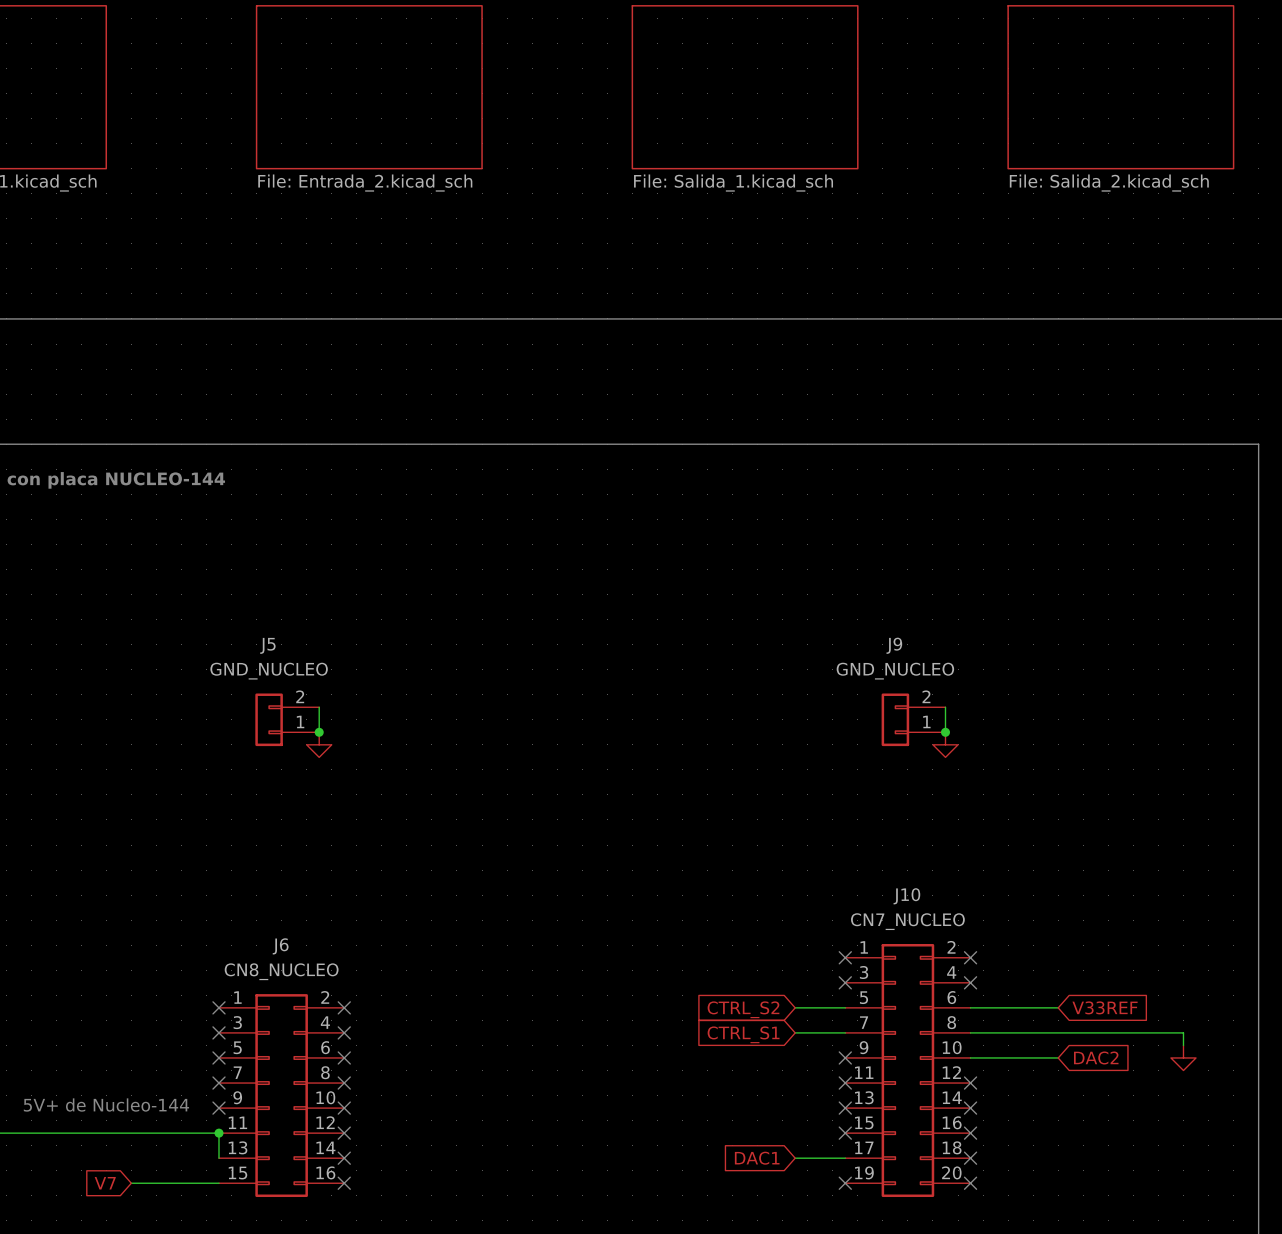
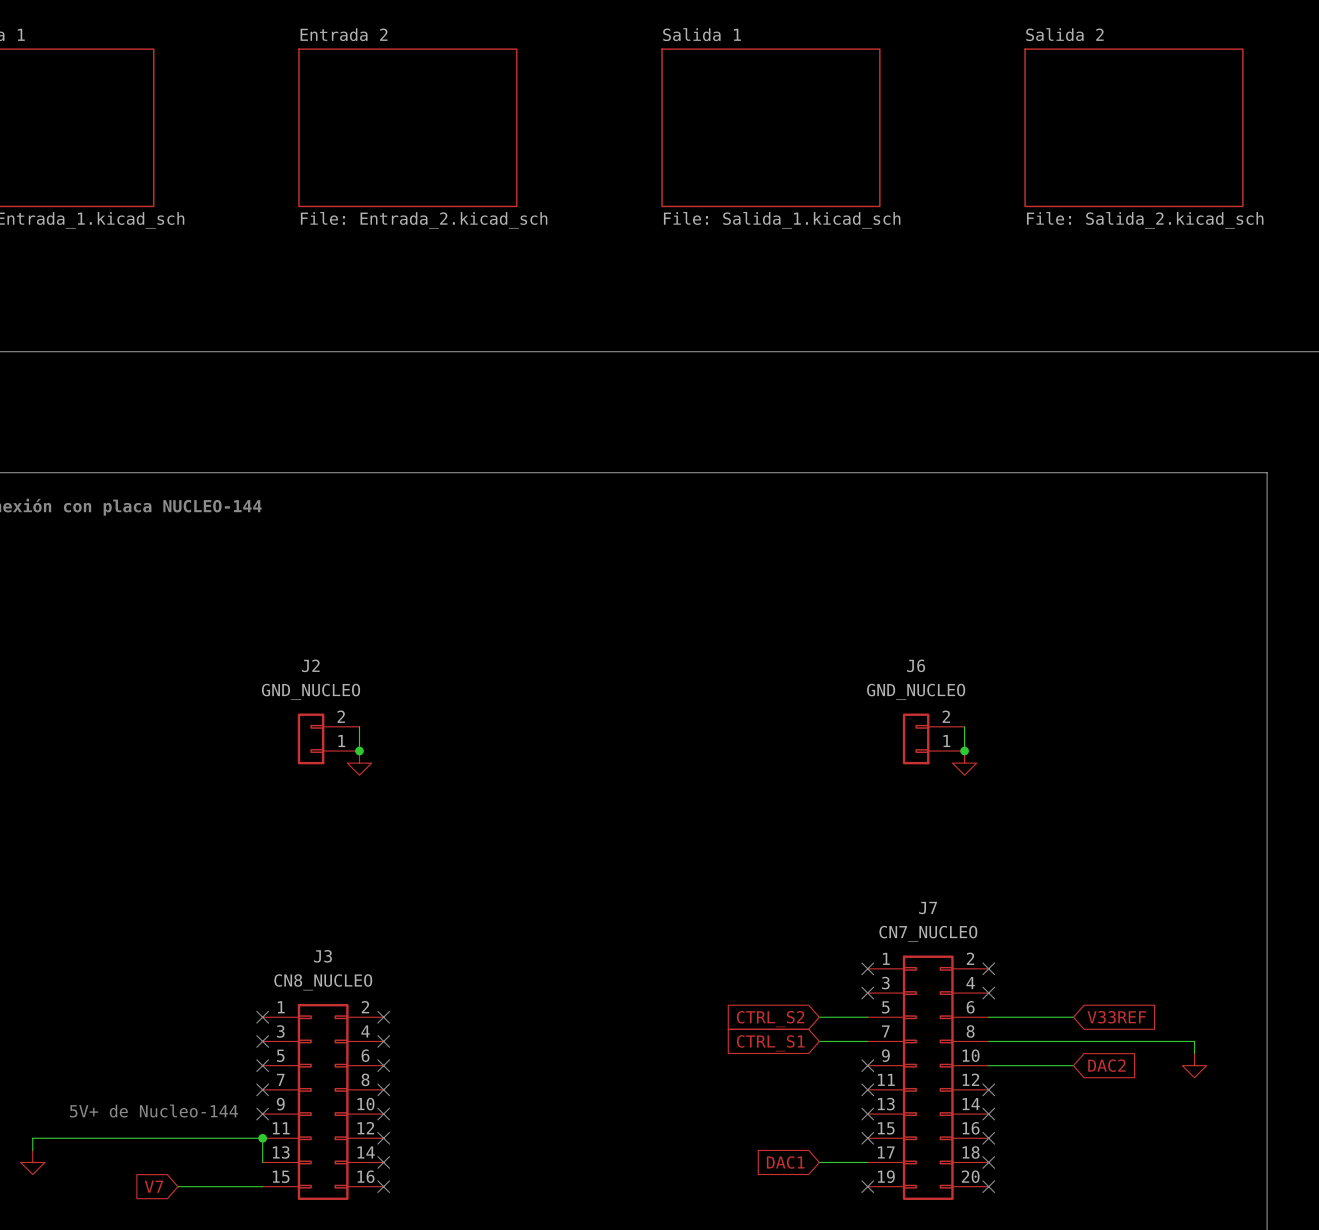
J5 name: J5 (267, 645) -> J2 (310, 665)
J9 name: J9 (894, 645) -> J6 (916, 665)
J10 name: J10 (906, 896) -> J7 (928, 908)
J6 name: J6 (280, 946) -> J3 (323, 956)

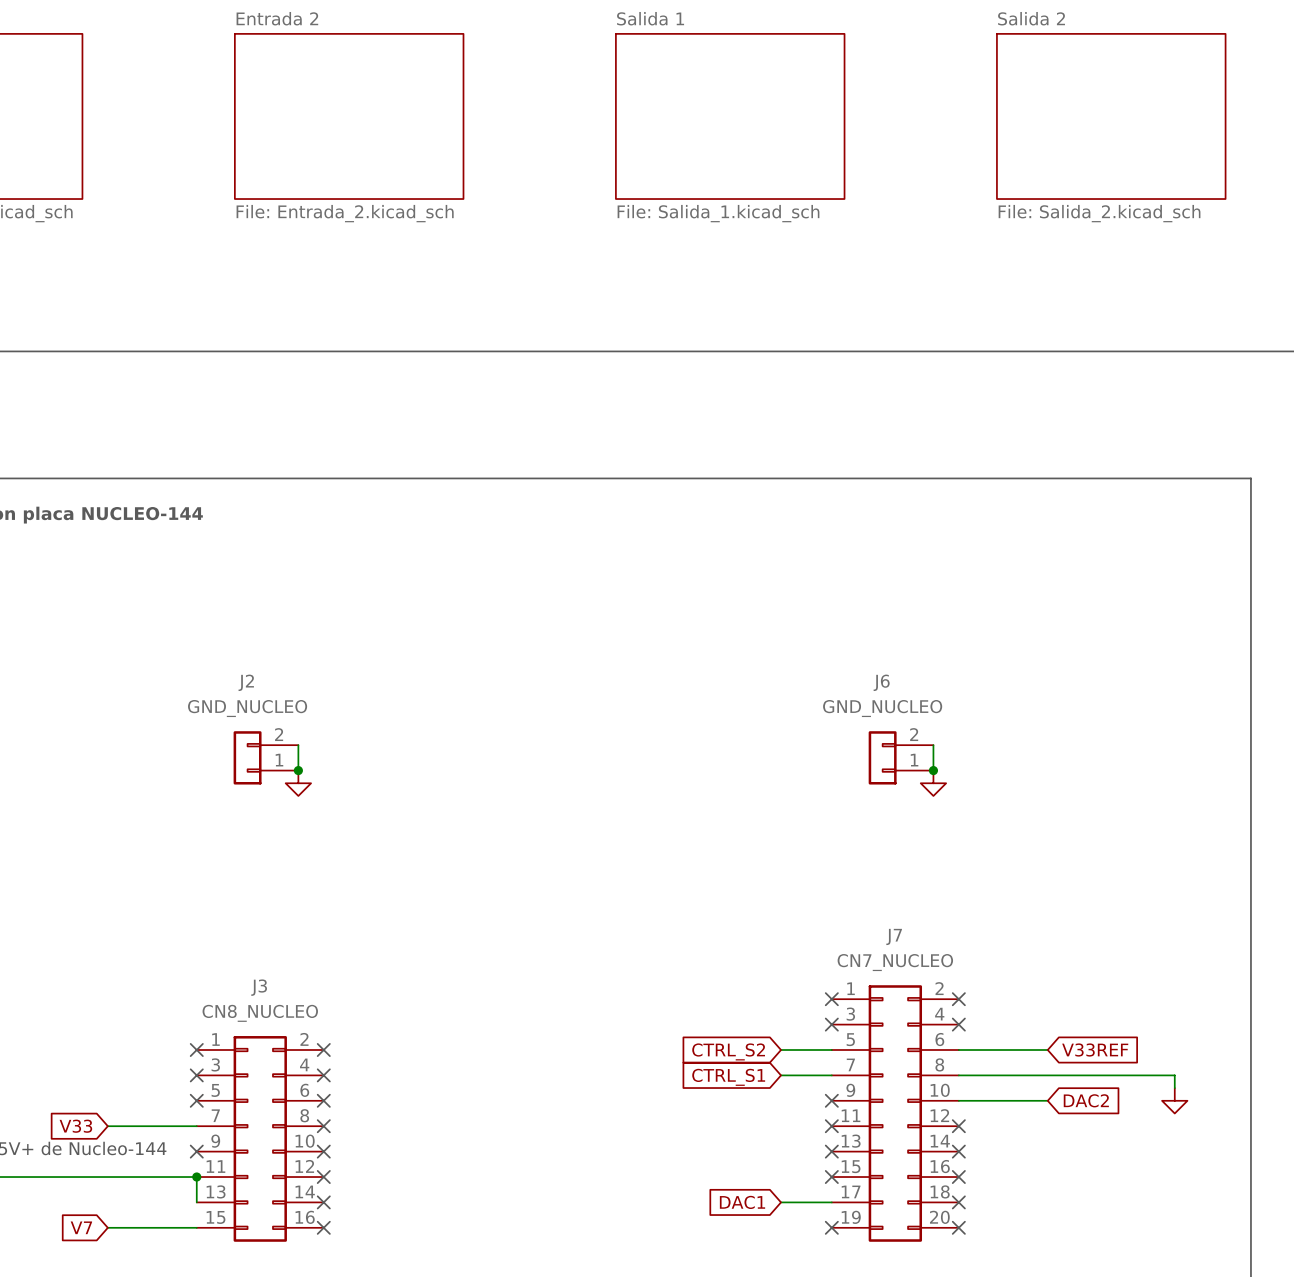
global label: none -> V33 (75, 1126)
wire: none -> (107, 1126) (196, 1126)
no-connect mark: (262, 1089) -> none

